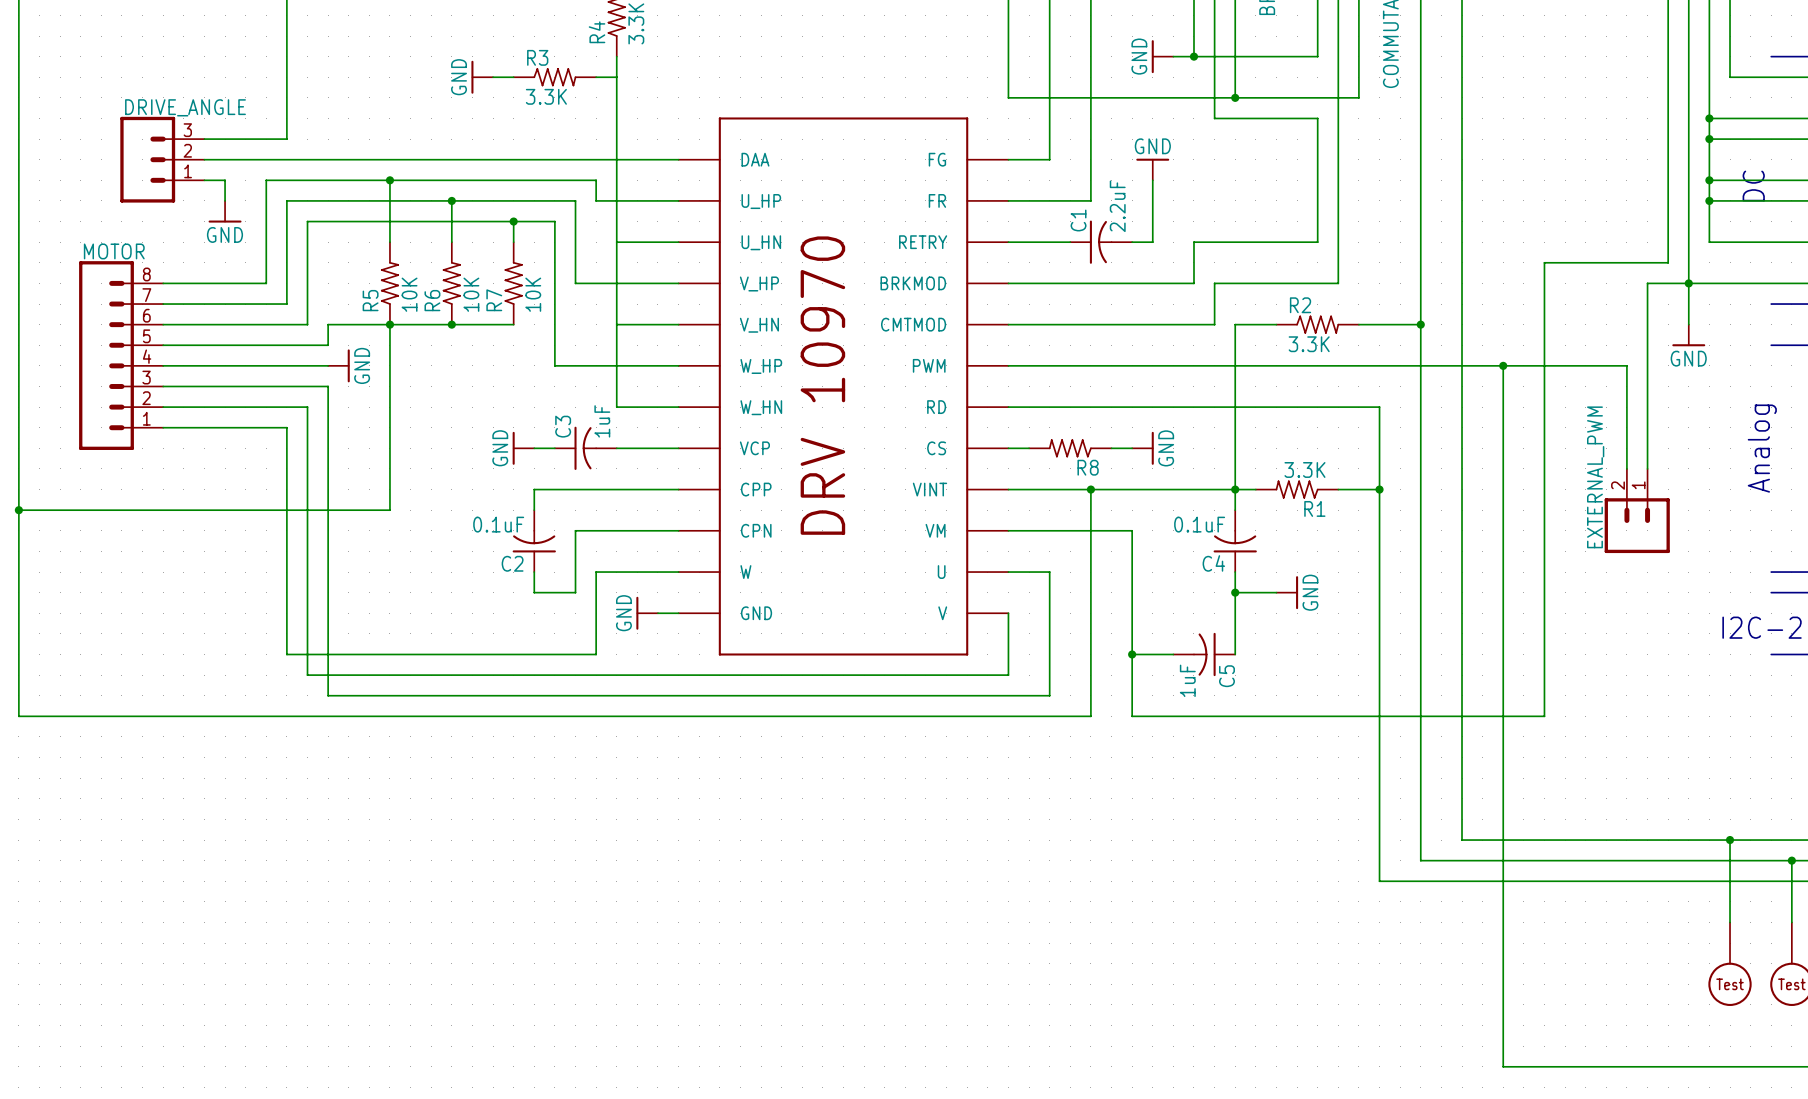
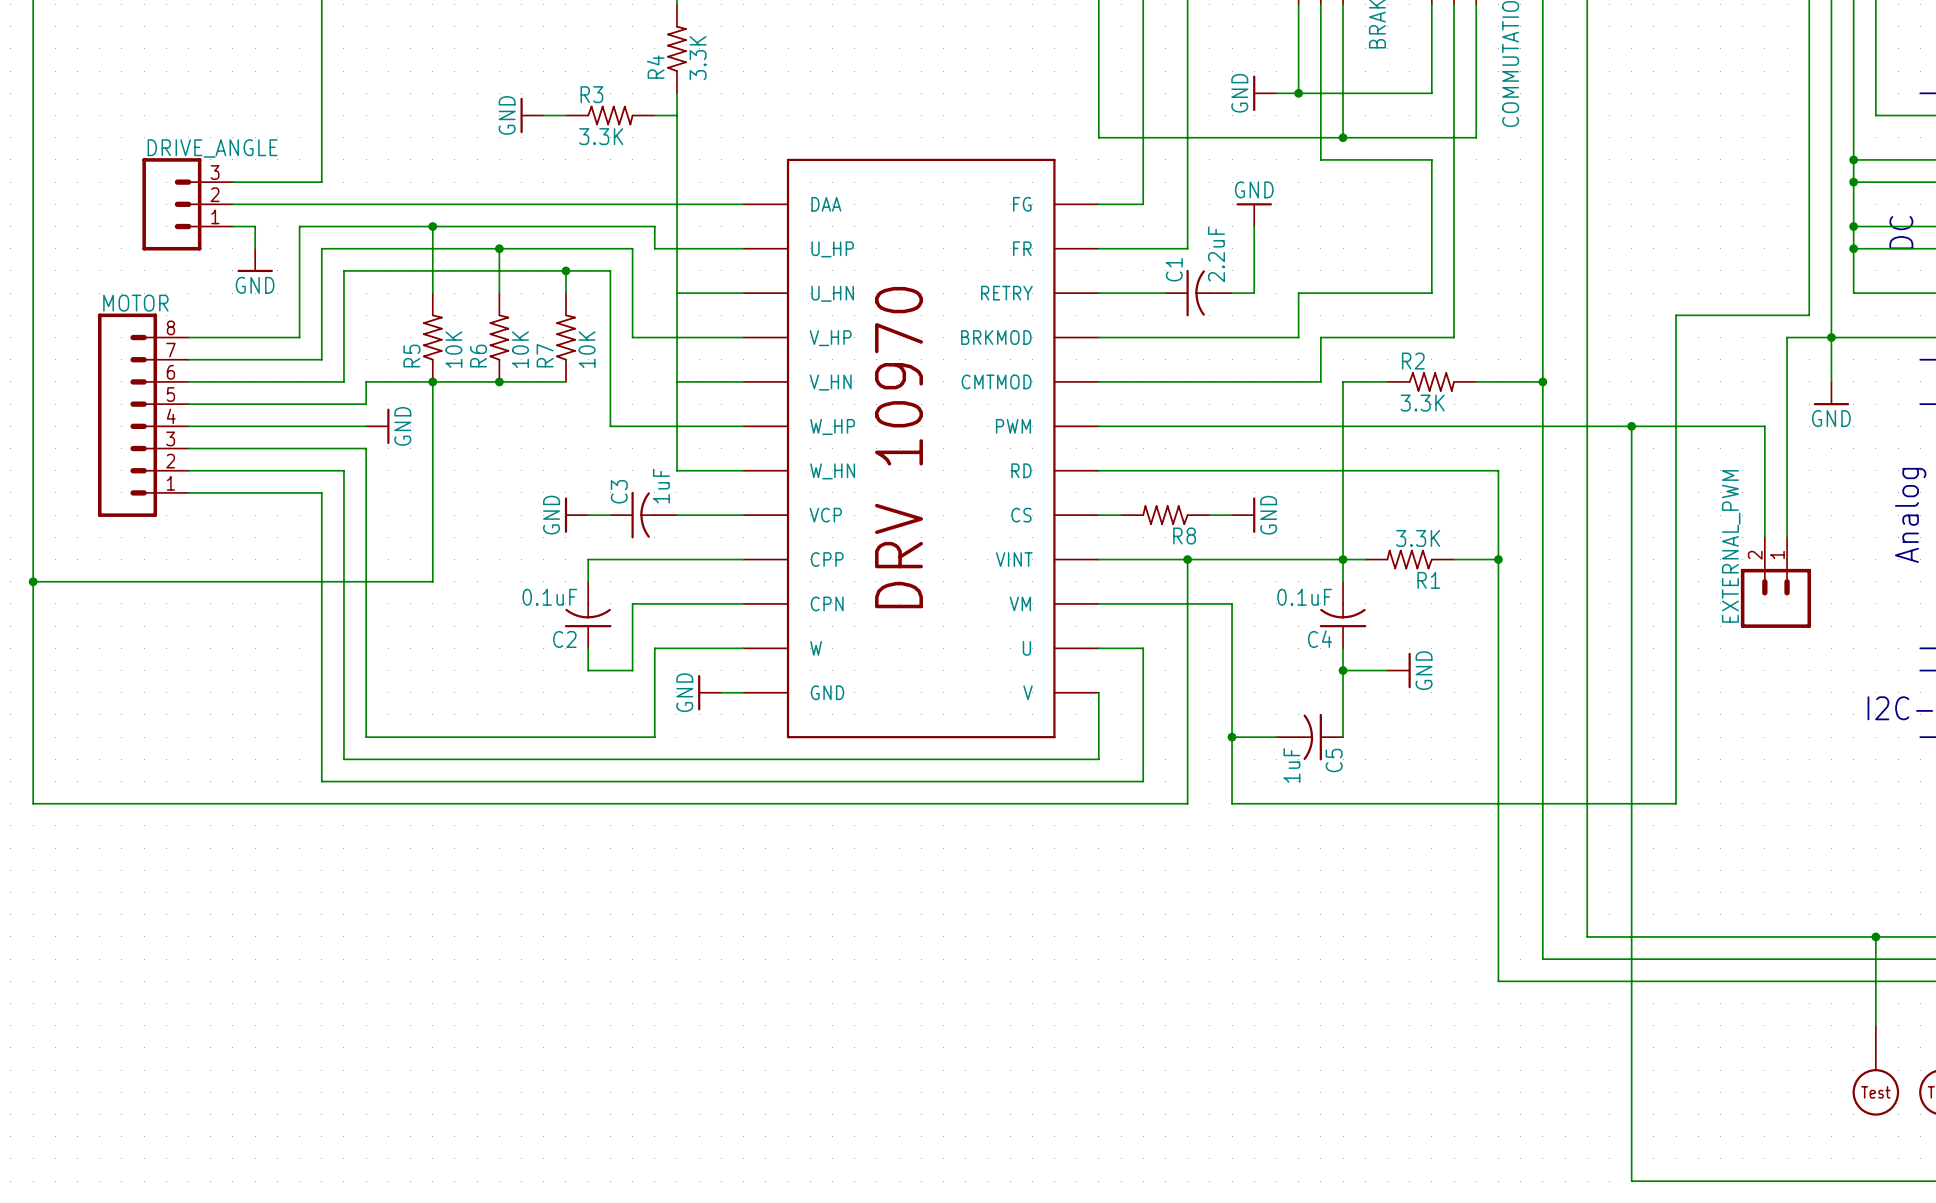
wire: (286, 654) (328, 654) (328, 695) -> (321, 737) (321, 781) (366, 781)

